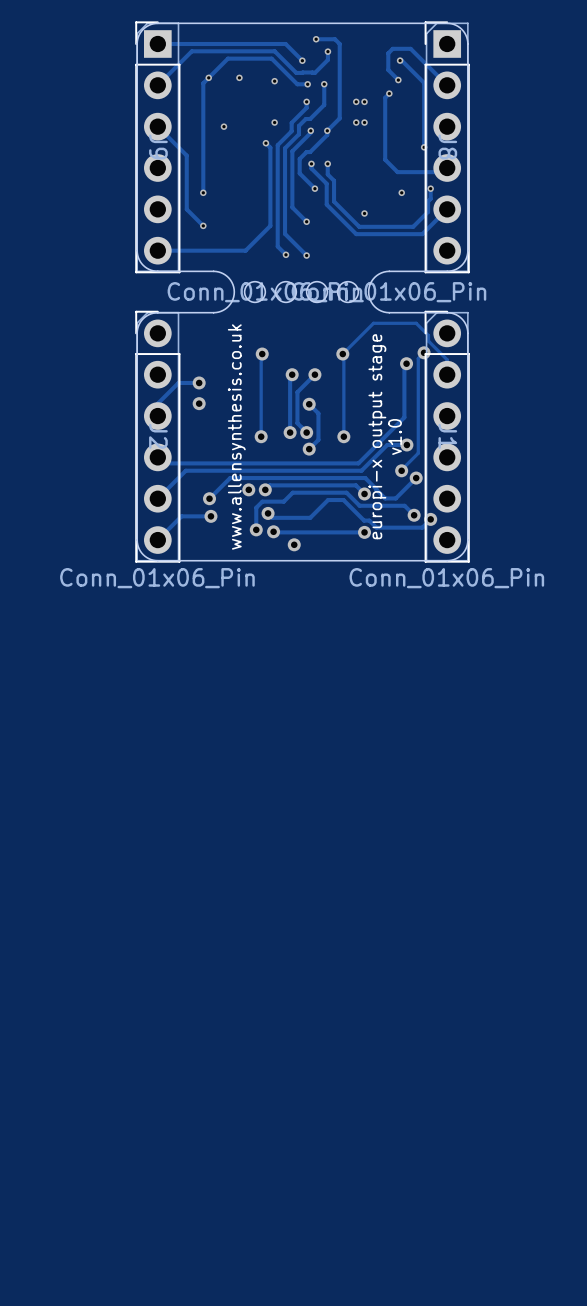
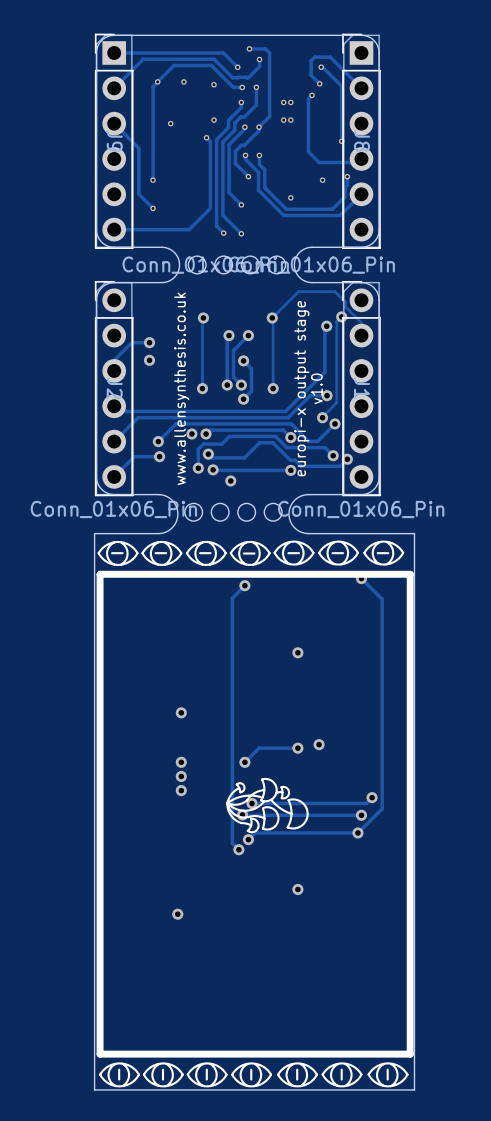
board edge: (385, 560) (209, 560) -> (308, 494) (295, 499) (289, 511) (291, 523) (301, 532) (414, 533) (414, 1089) (94, 1089) (94, 533) (158, 533) (168, 530) (176, 521) (177, 509) (170, 498) (158, 494)
round board edge: none -> [184, 502, 204, 522]
round board edge: none -> [210, 502, 230, 522]
round board edge: none -> [237, 502, 257, 522]
round board edge: none -> [263, 502, 283, 522]
line: none -> (114, 542) (109, 546) (107, 553) (109, 560) (114, 564)
line: none -> (121, 542) (126, 547) (127, 553) (126, 559) (121, 564)
line: none -> (158, 542) (153, 546) (150, 553) (153, 560) (158, 564)
line: none -> (165, 542) (169, 546) (171, 553) (169, 560) (165, 564)
line: none -> (202, 542) (197, 546) (195, 553) (197, 560) (202, 564)
line: none -> (209, 542) (214, 547) (215, 553) (213, 560) (209, 564)
line: none -> (246, 542) (241, 546) (239, 553) (241, 560) (246, 564)
line: none -> (253, 542) (258, 547) (259, 553) (258, 559) (253, 564)
line: none -> (290, 542) (284, 547) (283, 553) (284, 559) (290, 564)
line: none -> (297, 542) (301, 546) (303, 553) (302, 558) (297, 564)
line: none -> (334, 542) (329, 546) (327, 553) (329, 560) (334, 564)
line: none -> (341, 542) (346, 547) (348, 553) (346, 558) (341, 564)
line: none -> (379, 542) (375, 546) (372, 553) (375, 560) (379, 564)
line: none -> (386, 542) (391, 547) (393, 553) (391, 558) (386, 564)
line: none -> (313, 552) (305, 544) (294, 541) (282, 544) (274, 552) (283, 562) (294, 564) (306, 560) (313, 552)
line: none -> (357, 552) (348, 562) (338, 564) (326, 560) (319, 552) (327, 544) (338, 541) (349, 544) (357, 552)
line: none -> (403, 552) (394, 544) (383, 541) (372, 544) (364, 552) (373, 562) (383, 564) (396, 560) (403, 552)
line: none -> (122, 553) (112, 553)
line: none -> (137, 553) (129, 544) (118, 541) (106, 544) (98, 553) (107, 562) (118, 564) (128, 562) (137, 553)
line: none -> (166, 553) (155, 553)
line: none -> (181, 553) (173, 544) (161, 541) (150, 544) (142, 553) (149, 561) (161, 564) (174, 561) (181, 553)
line: none -> (210, 553) (200, 553)
line: none -> (225, 553) (216, 562) (206, 564) (196, 562) (186, 553) (195, 544) (206, 541) (217, 544) (225, 553)
line: none -> (254, 553) (243, 553)
line: none -> (269, 553) (260, 562) (250, 564) (240, 562) (230, 553) (238, 544) (250, 541) (261, 544) (269, 553)
line: none -> (298, 553) (288, 553)
line: none -> (343, 553) (332, 553)
line: none -> (388, 553) (377, 553)
line: none -> (410, 574) (100, 574) (100, 1054) (410, 1054) (410, 574)
track: none -> (361, 578) (382, 599) (382, 808) (358, 832) (255, 832) (248, 839)
via: none -> (361, 578)
track: none -> (244, 585) (232, 598) (232, 843) (238, 849)
via: none -> (244, 585)
via: none -> (297, 652)
via: none -> (181, 712)
via: none -> (319, 744)
track: none -> (297, 748) (259, 748) (244, 762)
via: none -> (297, 748)
via: none -> (181, 762)
via: none -> (244, 762)
via: none -> (181, 776)
line: none -> (262, 779) (264, 790) (261, 800) (269, 800) (275, 794) (276, 786) (270, 780) (262, 779)
line: none -> (236, 784) (243, 784) (243, 790) (240, 792) (236, 784)
line: none -> (239, 788) (231, 794) (227, 803)
line: none -> (264, 790) (254, 793) (241, 803) (227, 803)
via: none -> (181, 790)
line: none -> (282, 792) (275, 794)
line: none -> (262, 797) (244, 796) (227, 803)
track: none -> (372, 797) (366, 803) (251, 803)
via: none -> (372, 797)
line: none -> (282, 798) (286, 797) (288, 793) (287, 789) (284, 786) (281, 787) (281, 798)
line: none -> (271, 800) (280, 808) (291, 813)
line: none -> (288, 800) (299, 800) (306, 808) (306, 819) (298, 827) (287, 827) (291, 813) (288, 800)
line: none -> (264, 801) (257, 807) (246, 810) (234, 808) (227, 803)
line: none -> (227, 803) (231, 812) (238, 816) (256, 816) (264, 818)
line: none -> (227, 803) (229, 813) (234, 819) (251, 825)
via: none -> (251, 803)
line: none -> (263, 807) (272, 808) (277, 814) (277, 823) (271, 828) (262, 828) (264, 818) (262, 808)
track: none -> (242, 814) (361, 815)
via: none -> (242, 814)
via: none -> (361, 815)
line: none -> (250, 818) (251, 825) (247, 830) (252, 832) (256, 830) (258, 824) (256, 820) (250, 818)
via: none -> (357, 832)
via: none -> (248, 839)
via: none -> (238, 849)
via: none -> (297, 889)
via: none -> (177, 914)
line: none -> (115, 1064) (110, 1069) (108, 1074) (110, 1082) (115, 1085)
line: none -> (122, 1064) (127, 1069) (129, 1074) (127, 1080) (122, 1085)
line: none -> (159, 1064) (154, 1067) (152, 1074) (154, 1082) (159, 1085)
line: none -> (166, 1064) (171, 1069) (172, 1074) (170, 1081) (166, 1085)
line: none -> (203, 1064) (198, 1067) (196, 1074) (197, 1080) (203, 1085)
line: none -> (210, 1064) (214, 1068) (216, 1074) (214, 1081) (210, 1085)
line: none -> (247, 1064) (242, 1069) (240, 1074) (242, 1080) (247, 1085)
line: none -> (254, 1064) (259, 1069) (261, 1074) (259, 1080) (254, 1085)
line: none -> (293, 1064) (288, 1067) (286, 1074) (288, 1082) (293, 1085)
line: none -> (300, 1064) (305, 1069) (307, 1074) (304, 1081) (300, 1085)
line: none -> (338, 1064) (333, 1067) (331, 1074) (333, 1082) (338, 1085)
line: none -> (345, 1064) (349, 1068) (351, 1074) (350, 1080) (345, 1085)
line: none -> (384, 1064) (378, 1069) (377, 1074) (378, 1080) (384, 1085)
line: none -> (391, 1064) (395, 1068) (397, 1074) (395, 1081) (391, 1085)
line: none -> (119, 1069) (119, 1079)
line: none -> (163, 1069) (163, 1079)
line: none -> (206, 1069) (206, 1079)
line: none -> (251, 1069) (251, 1079)
line: none -> (297, 1069) (297, 1079)
line: none -> (341, 1069) (341, 1079)
line: none -> (387, 1069) (387, 1079)
line: none -> (138, 1074) (130, 1066) (119, 1063) (108, 1066) (100, 1074) (109, 1083) (119, 1086) (132, 1082) (138, 1074)
line: none -> (182, 1074) (175, 1082) (163, 1086) (150, 1082) (143, 1074) (152, 1066) (163, 1063) (174, 1066) (182, 1074)
line: none -> (226, 1074) (219, 1082) (207, 1086) (194, 1082) (187, 1074) (195, 1066) (207, 1063) (218, 1066) (226, 1074)
line: none -> (271, 1074) (262, 1066) (251, 1063) (240, 1066) (232, 1074) (239, 1082) (251, 1086) (261, 1083) (271, 1074)
line: none -> (316, 1074) (308, 1066) (297, 1063) (286, 1066) (278, 1074) (285, 1082) (297, 1086) (310, 1082) (316, 1074)
line: none -> (361, 1074) (353, 1066) (342, 1063) (330, 1066) (322, 1074) (329, 1082) (342, 1086) (354, 1082) (361, 1074)
line: none -> (407, 1074) (399, 1066) (388, 1063) (376, 1066) (368, 1074) (375, 1082) (388, 1086) (400, 1082) (407, 1074)

